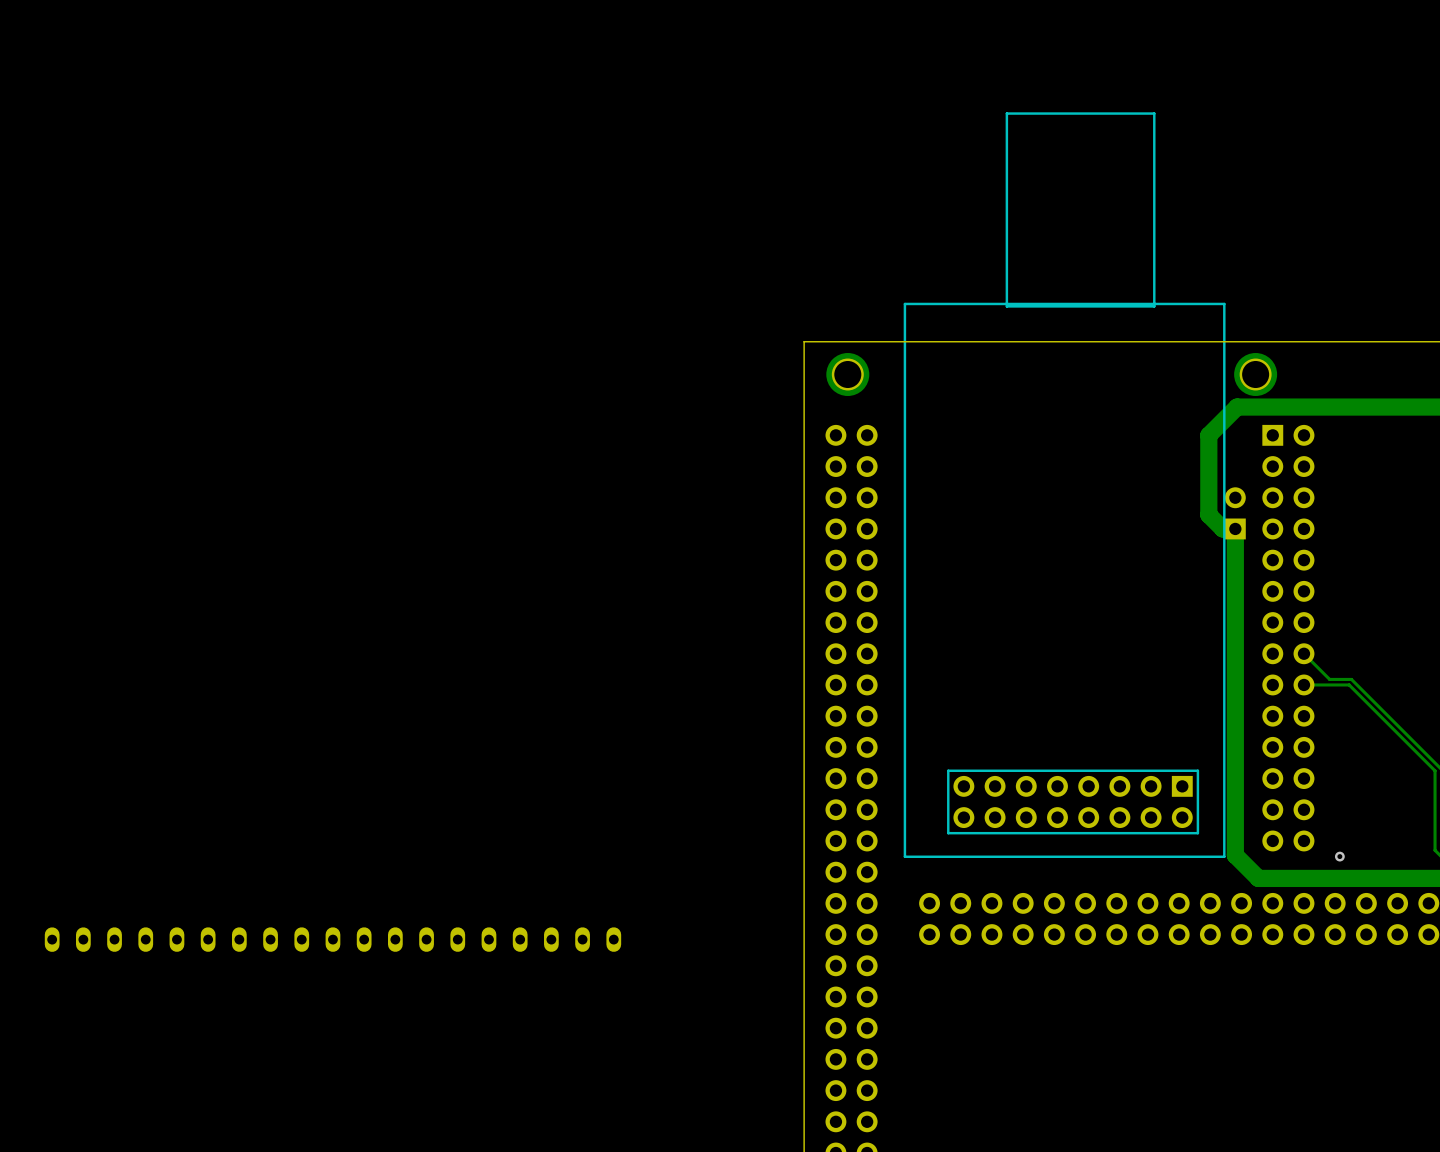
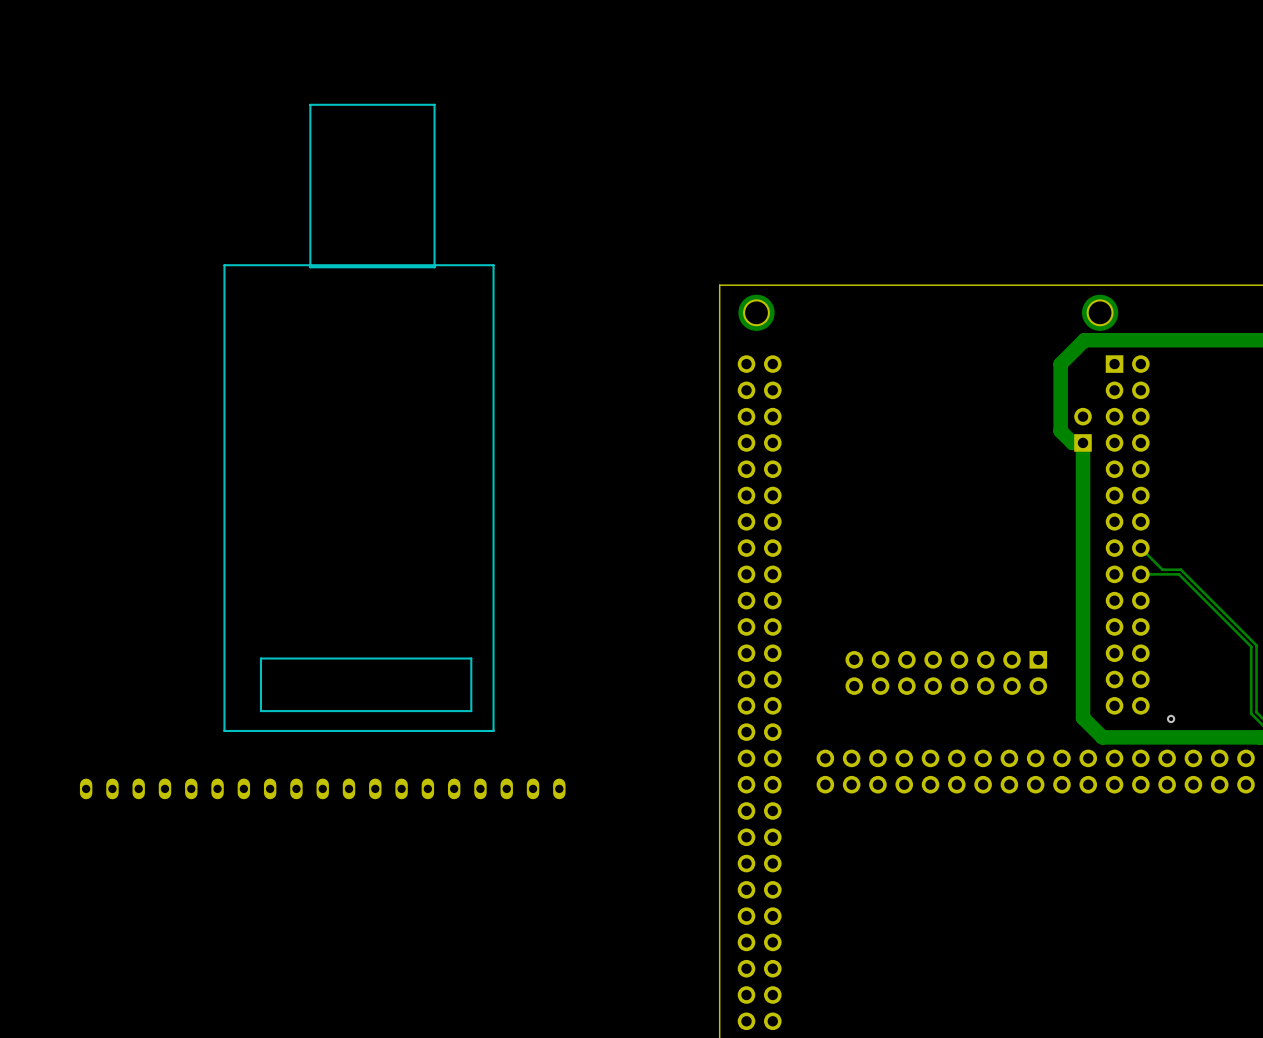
line: (1154, 113) (1006, 113) (1006, 306) (1154, 306) (1154, 113) -> none
line: none -> (434, 104) (310, 104) (310, 267) (434, 267) (434, 104)
line: (1224, 303) (904, 303) (904, 856) (1224, 856) (1224, 303) -> none
line: none -> (493, 265) (224, 265) (224, 730) (493, 730) (493, 265)
line: (1197, 770) (948, 770) (948, 833) (1197, 833) (1197, 770) -> none
line: none -> (471, 658) (260, 658) (260, 711) (471, 711) (471, 658)

